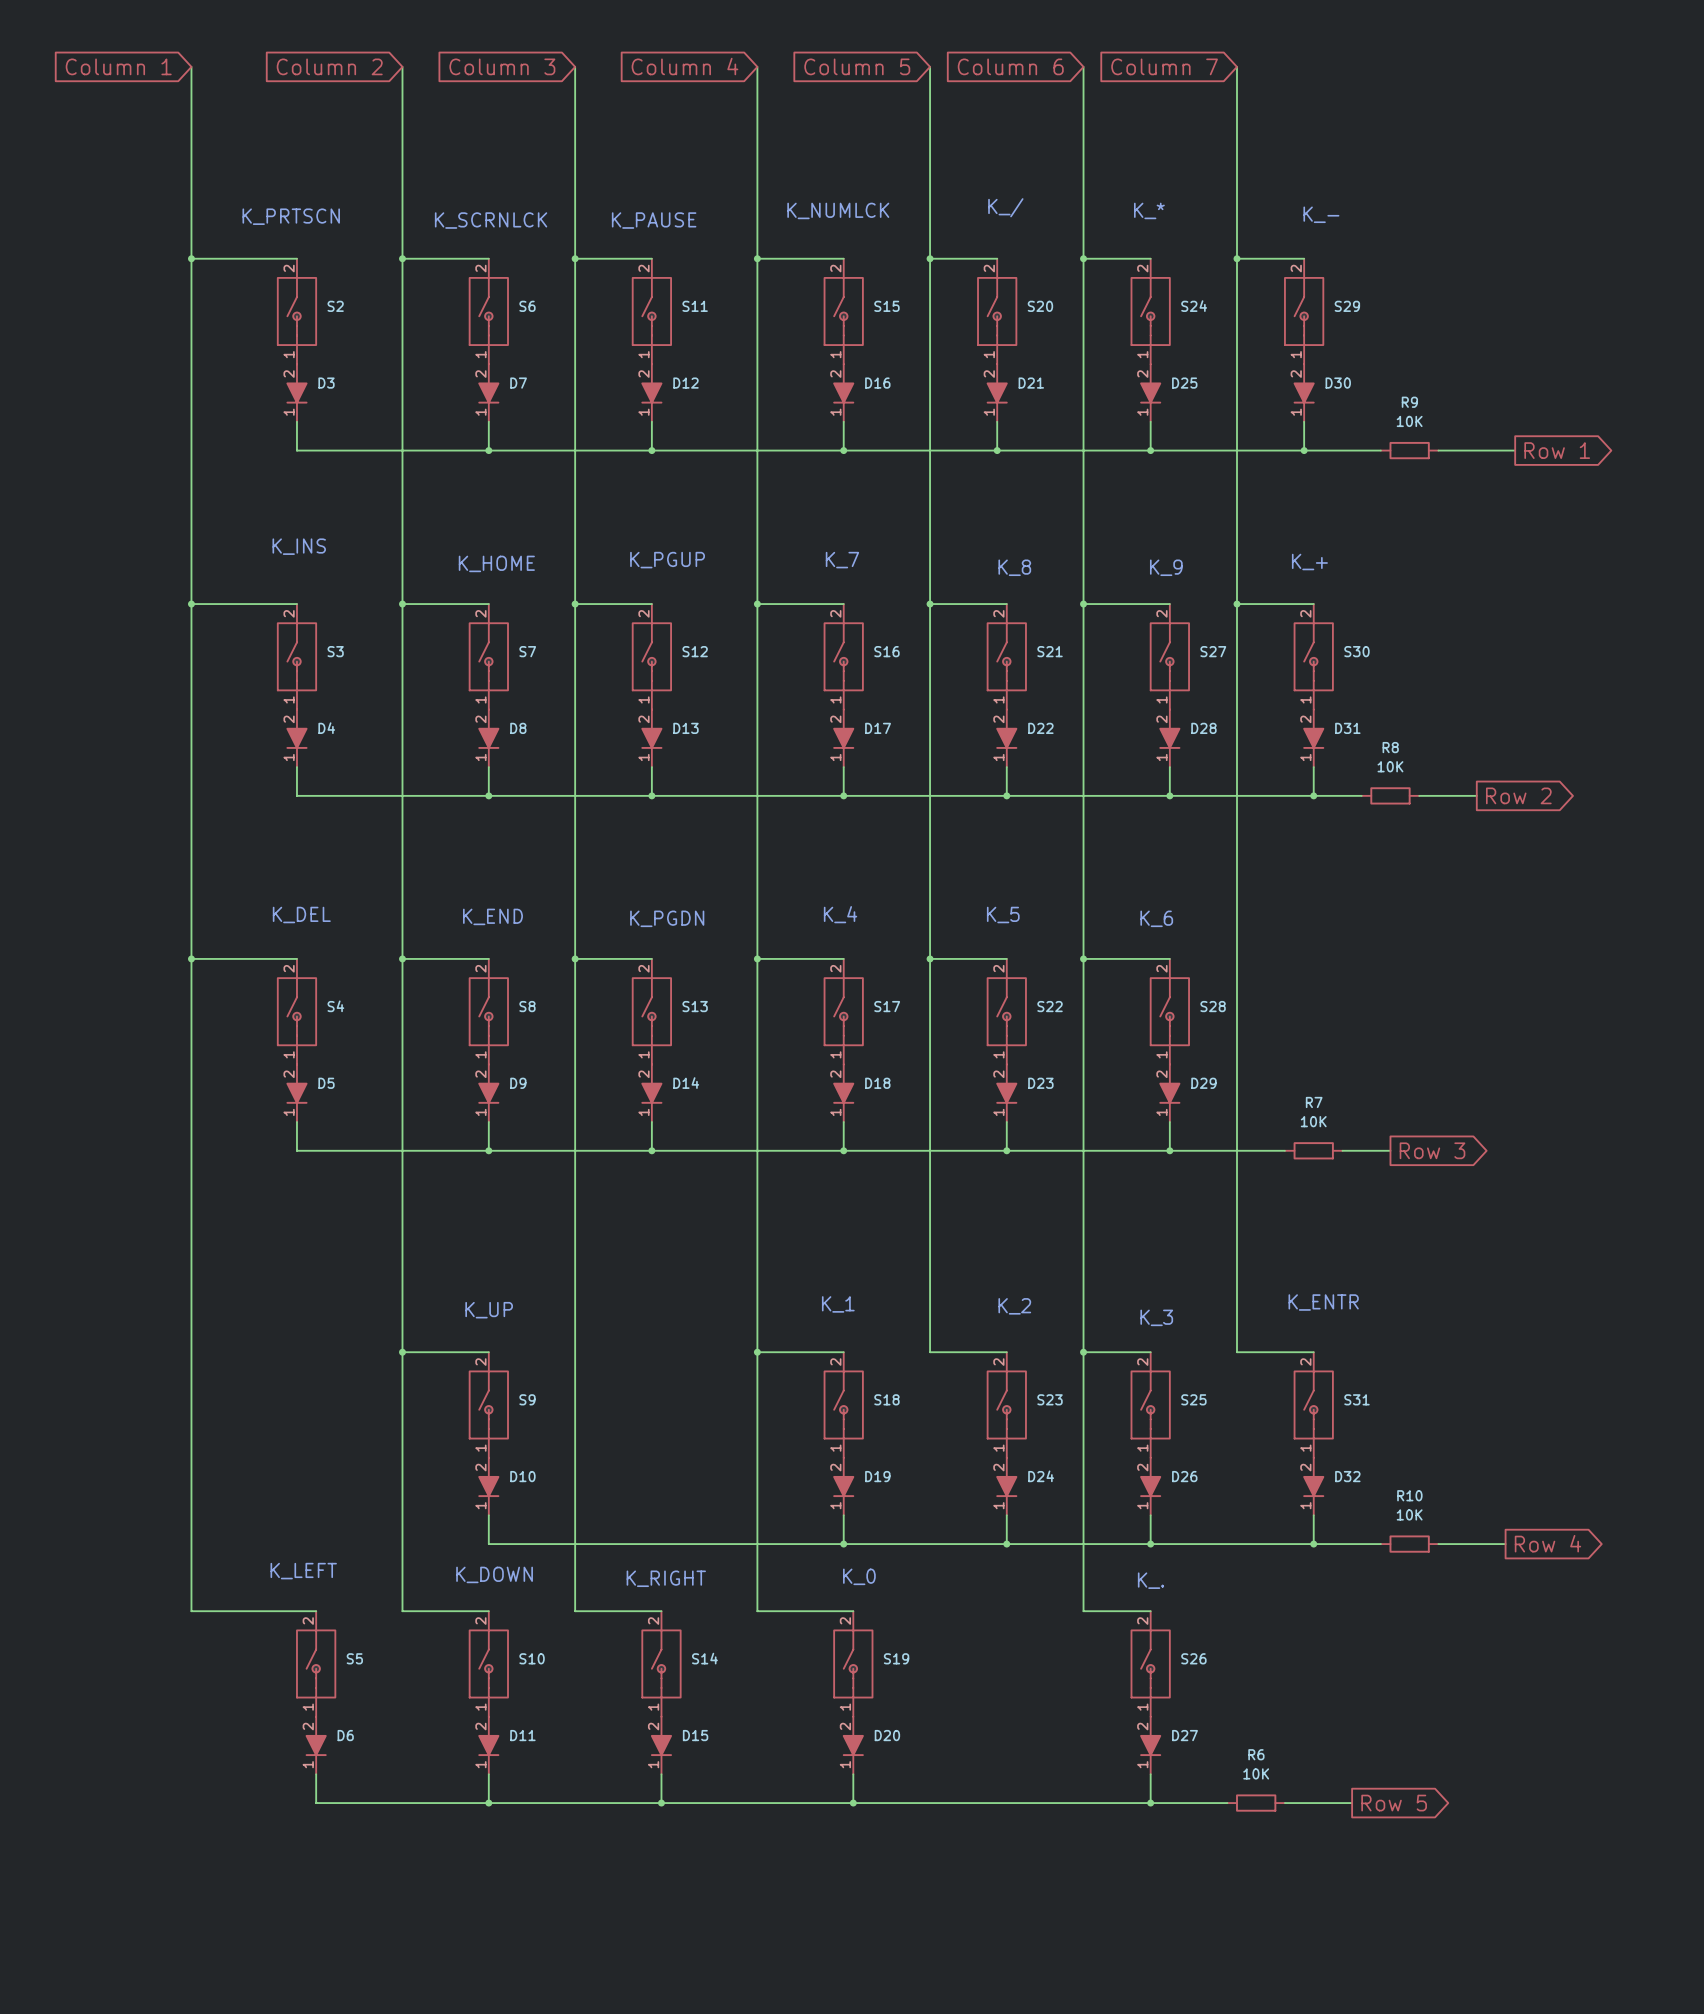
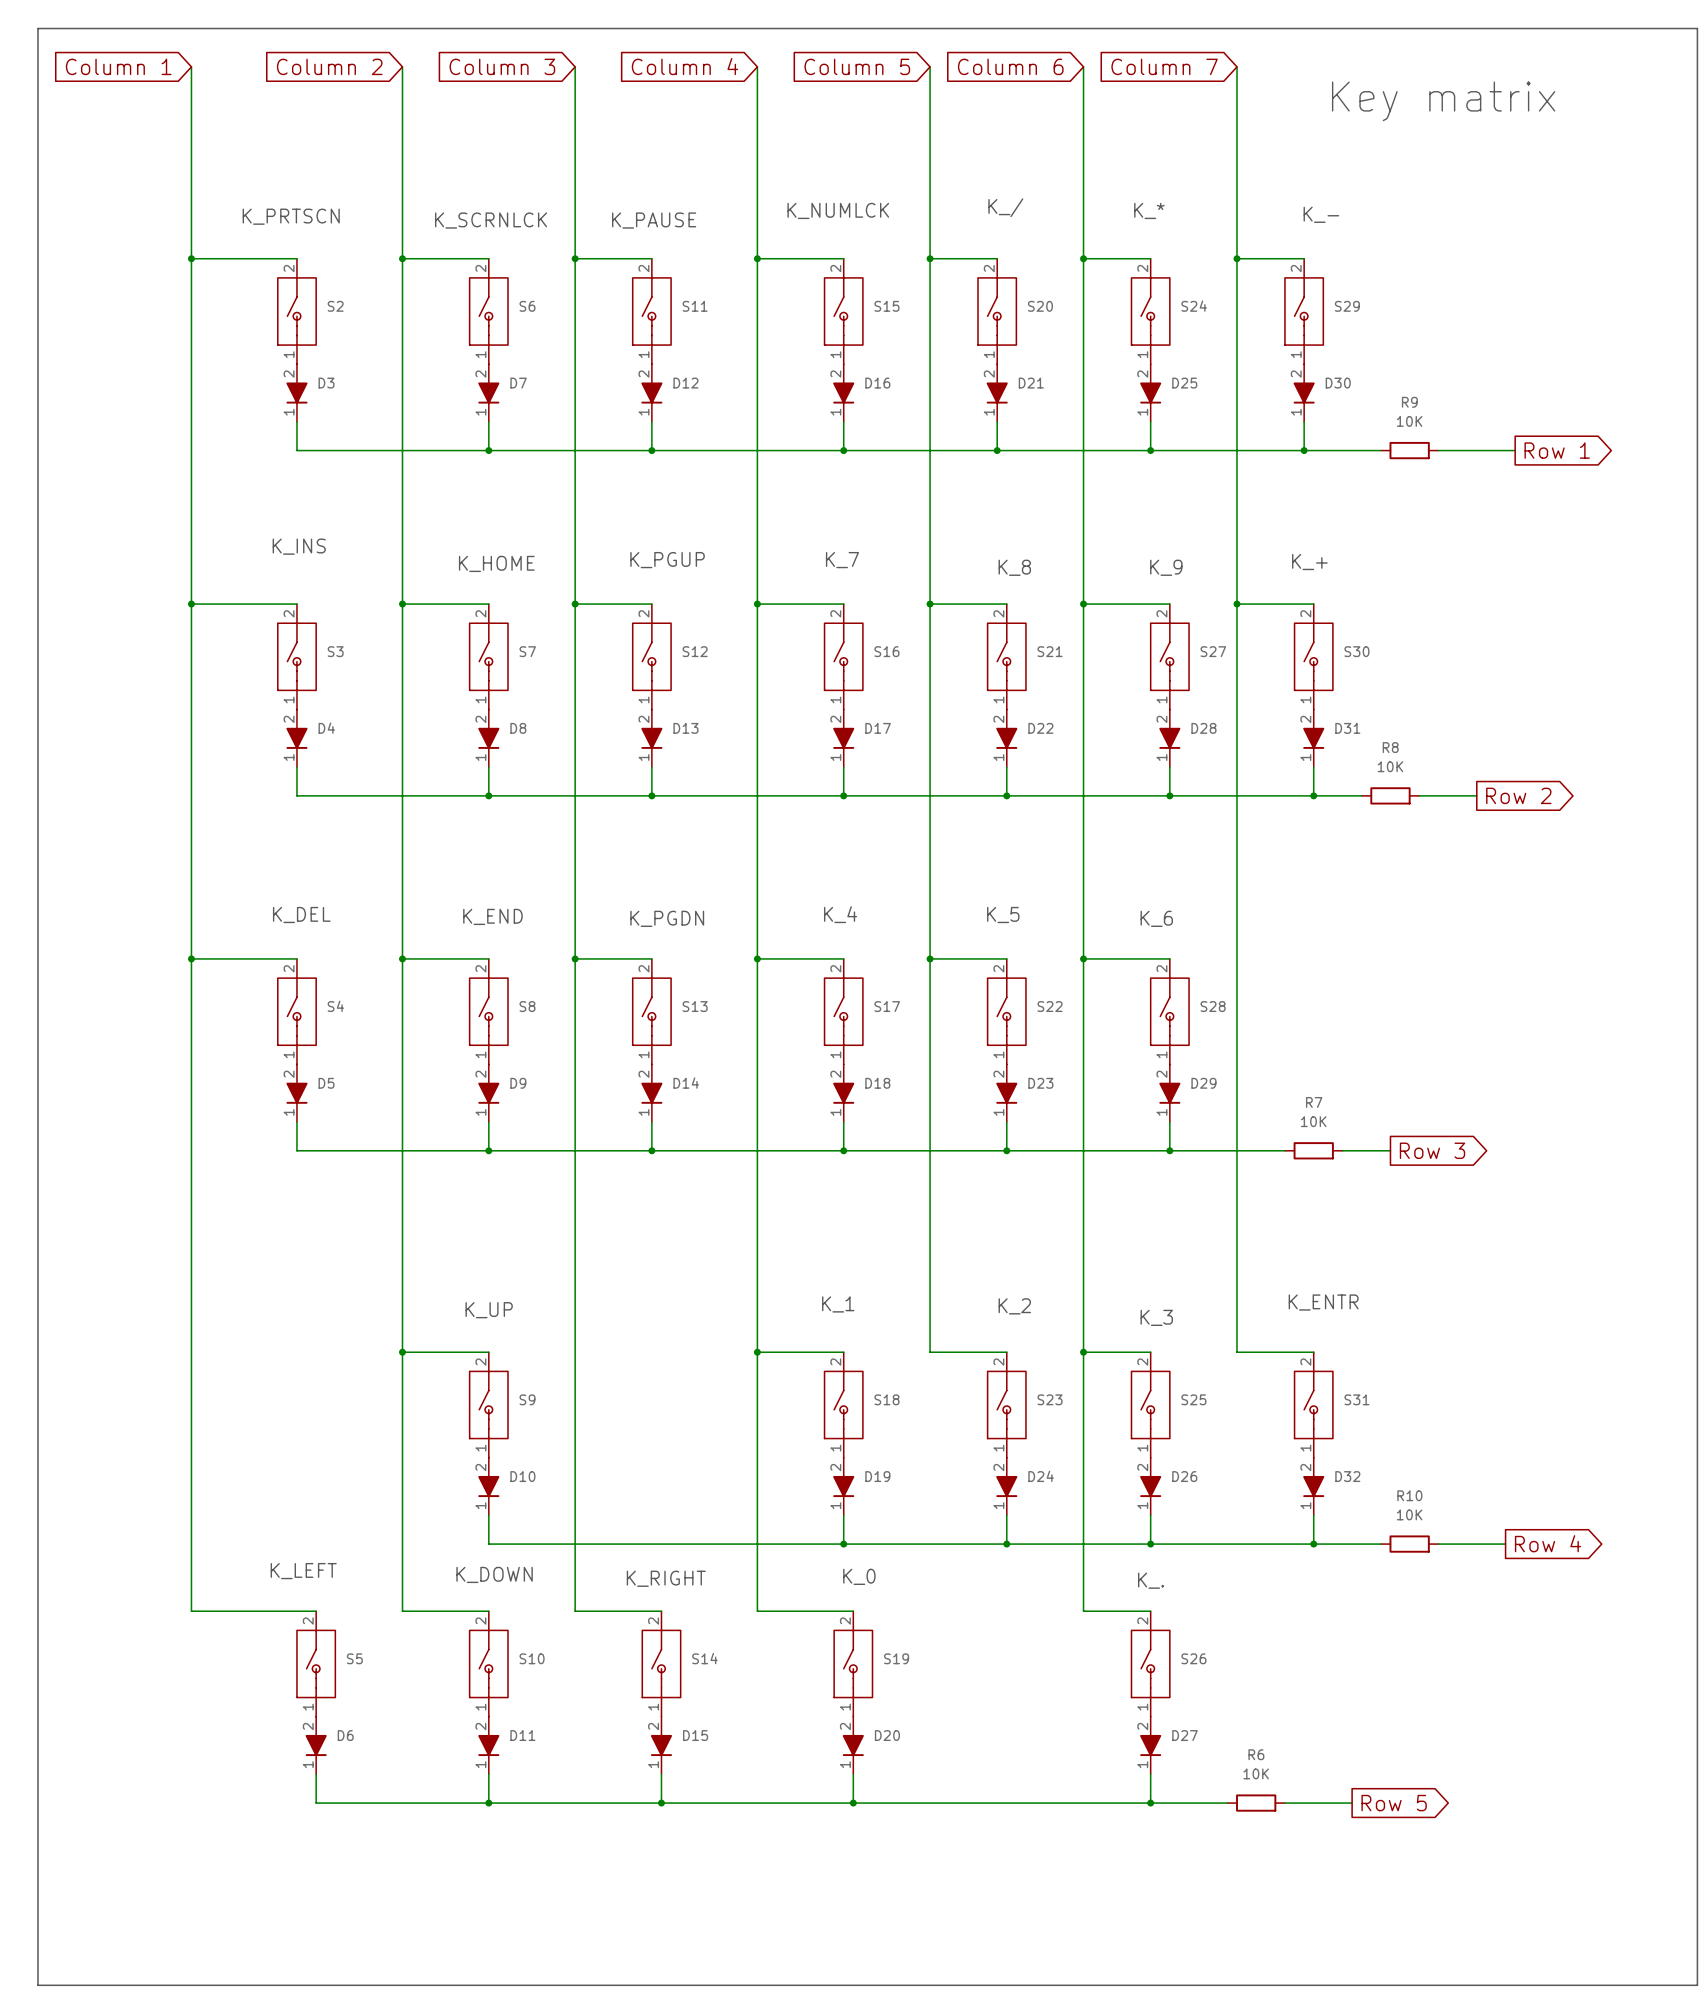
line: none -> (37, 28) (1697, 28) (1697, 1985) (37, 1985) (37, 28)
text: none -> Key matrix (1443, 101)

